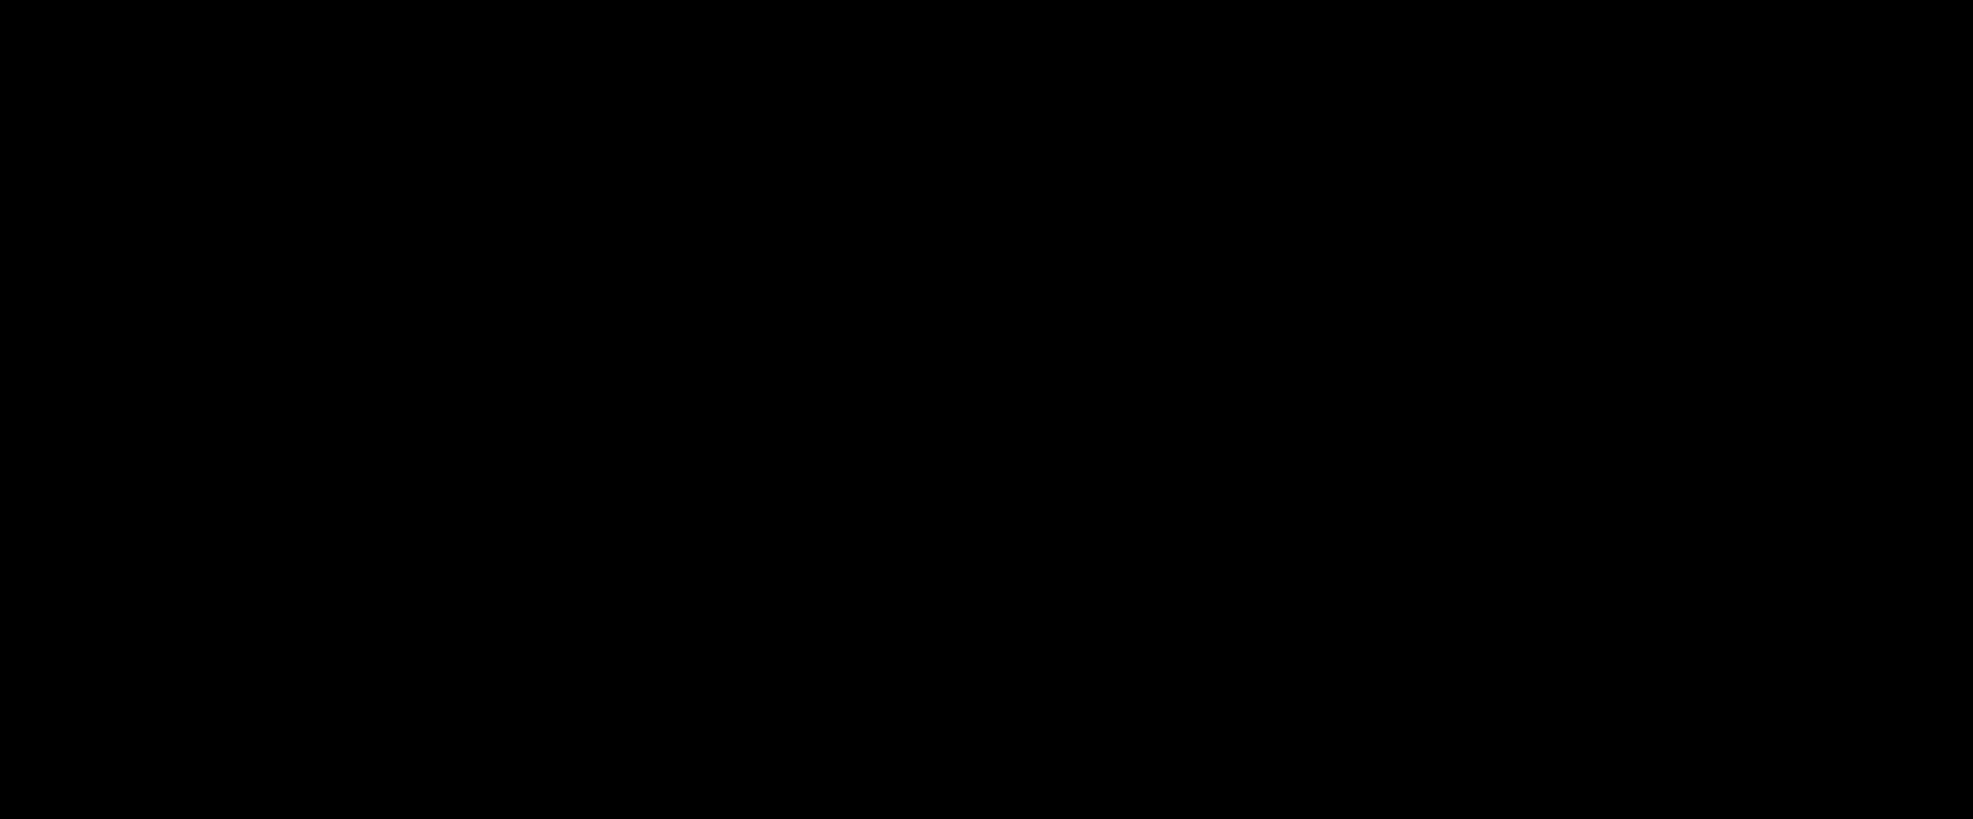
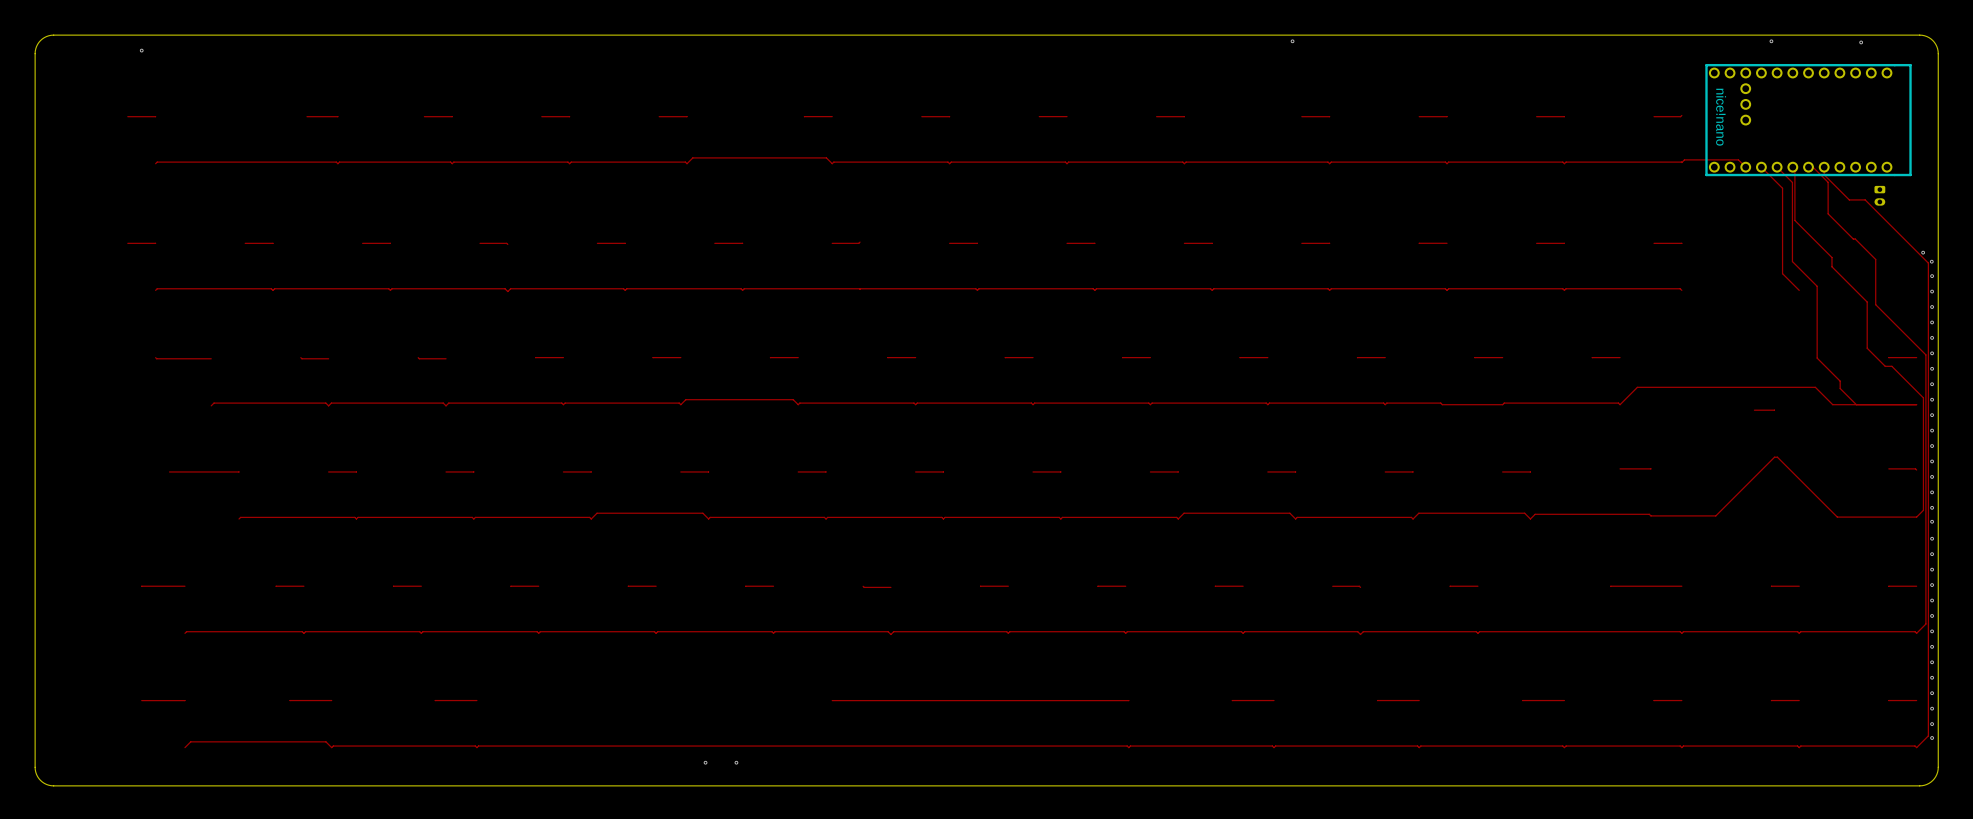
board edge: none -> (53, 35) (1926, 36) (1934, 42) (1938, 53) (1936, 774) (1931, 782) (1919, 785) (46, 784) (37, 776) (35, 767) (35, 53) (40, 40) (53, 35)
via: none -> (1292, 41)
via: none -> (1771, 41)
via: none -> (1861, 42)
via: none -> (141, 50)
track: none -> (1681, 115) (1654, 116)
track: none -> (127, 116) (155, 116)
track: none -> (307, 116) (337, 116)
track: none -> (424, 116) (452, 116)
track: none -> (541, 116) (569, 116)
track: none -> (659, 116) (686, 116)
track: none -> (804, 116) (832, 116)
track: none -> (921, 116) (949, 116)
track: none -> (1039, 116) (1067, 116)
track: none -> (1156, 116) (1184, 116)
track: none -> (1301, 116) (1329, 116)
track: none -> (1419, 116) (1446, 116)
track: none -> (1536, 116) (1564, 116)
text: none -> nice!nano (1721, 117)
part: none -> (1808, 120)
track: none -> (155, 163) (157, 162) (336, 162) (337, 163) (339, 162) (450, 162) (452, 163) (453, 162) (568, 162) (569, 163) (571, 162) (685, 162) (687, 163) (692, 157) (826, 157) (832, 163) (833, 162) (948, 162) (949, 163) (951, 162) (1065, 162) (1067, 163) (1068, 162) (1182, 162) (1184, 163) (1186, 162) (1328, 162) (1329, 163) (1331, 162) (1445, 162) (1447, 163) (1448, 162) (1562, 162) (1564, 163) (1566, 162) (1681, 162) (1684, 159) (1738, 159) (1745, 167)
track: none -> (1761, 167) (1782, 188) (1782, 273) (1799, 290)
track: none -> (1777, 167) (1792, 182) (1792, 261) (1817, 286) (1817, 358) (1840, 381) (1840, 388) (1856, 404)
track: none -> (1792, 167) (1794, 169) (1794, 220) (1831, 257) (1831, 266) (1867, 302) (1867, 348) (1885, 366) (1891, 366) (1923, 397) (1923, 510) (1916, 517) (1837, 517) (1777, 457) (1774, 457) (1715, 515) (1535, 514) (1530, 519) (1524, 513) (1418, 513) (1413, 519) (1411, 517) (1297, 517) (1295, 519) (1289, 513) (1184, 513) (1178, 519) (1176, 517) (1062, 517) (1060, 519) (1059, 517) (945, 517) (943, 519) (941, 517) (827, 517) (826, 519) (824, 517) (710, 517) (708, 519) (702, 513) (597, 513) (591, 519) (589, 517) (475, 517) (473, 519) (472, 517) (358, 517) (356, 519) (354, 517) (240, 517) (239, 519)
track: none -> (1808, 167) (1812, 167) (1828, 182) (1828, 213) (1875, 259) (1875, 304) (1925, 354) (1925, 624) (1916, 633) (1915, 631) (1800, 631) (1799, 633) (1797, 631) (1683, 631) (1681, 633) (1680, 631) (1479, 631) (1477, 633) (1476, 631) (1363, 631) (1360, 634) (1357, 631) (1244, 631) (1243, 633) (1241, 631) (1127, 631) (1125, 633) (1124, 631) (1009, 631) (1008, 633) (1006, 631) (893, 631) (890, 634) (888, 631) (775, 631) (773, 633) (771, 631) (657, 631) (656, 633) (654, 631) (540, 631) (538, 633) (537, 631) (422, 631) (421, 633) (419, 631) (305, 631) (303, 633) (302, 631) (186, 631) (184, 633)
track: none -> (1824, 167) (1824, 174) (1849, 199) (1865, 199) (1928, 263) (1928, 735) (1916, 747) (1915, 746) (1800, 746) (1799, 747) (1797, 746) (1683, 746) (1681, 747) (1680, 746) (1566, 746) (1564, 747) (1562, 746) (1420, 746) (1419, 747) (1417, 746) (1275, 746) (1274, 747) (1272, 746) (1130, 746) (1128, 747) (1127, 746) (478, 746) (476, 747) (475, 746) (333, 746) (331, 747) (325, 741) (190, 741) (184, 747)
part: none -> (1879, 195)
track: none -> (860, 242) (832, 243)
track: none -> (127, 243) (155, 243)
track: none -> (245, 243) (272, 243)
track: none -> (362, 243) (390, 243)
track: none -> (480, 243) (507, 244)
track: none -> (597, 243) (625, 243)
track: none -> (714, 243) (742, 243)
track: none -> (949, 243) (977, 243)
track: none -> (1067, 243) (1094, 243)
track: none -> (1184, 243) (1212, 243)
track: none -> (1301, 243) (1329, 243)
track: none -> (1419, 243) (1447, 243)
track: none -> (1536, 243) (1564, 243)
track: none -> (1654, 243) (1681, 243)
via: none -> (1923, 252)
via: none -> (1931, 261)
via: none -> (1932, 276)
track: none -> (155, 290) (157, 288) (271, 288) (273, 290) (274, 288) (388, 288) (390, 290) (392, 288) (505, 288) (507, 291) (510, 288) (623, 288) (625, 290) (626, 288) (741, 288) (742, 290) (744, 288) (975, 288) (977, 290) (979, 288) (1093, 288) (1094, 290) (1096, 288) (1210, 288) (1212, 290) (1213, 288) (1328, 288) (1329, 290) (1331, 288) (1445, 288) (1447, 290) (1448, 288) (1562, 288) (1564, 290) (1566, 288) (1680, 288) (1681, 290)
via: none -> (1932, 291)
via: none -> (1932, 307)
via: none -> (1932, 322)
via: none -> (1932, 337)
via: none -> (1932, 353)
track: none -> (155, 357) (211, 358)
track: none -> (300, 357) (328, 358)
track: none -> (418, 357) (446, 358)
track: none -> (535, 357) (563, 357)
track: none -> (653, 357) (680, 357)
track: none -> (770, 357) (798, 357)
track: none -> (887, 357) (915, 357)
track: none -> (1005, 357) (1033, 357)
track: none -> (1122, 357) (1150, 357)
track: none -> (1240, 357) (1267, 357)
track: none -> (1357, 357) (1385, 357)
track: none -> (1474, 357) (1502, 357)
track: none -> (1592, 357) (1620, 357)
track: none -> (1888, 357) (1916, 357)
via: none -> (1932, 368)
via: none -> (1932, 384)
via: none -> (1932, 399)
track: none -> (1916, 404) (1832, 404) (1815, 387) (1637, 387) (1620, 404) (1618, 403) (1504, 403) (1502, 404) (799, 403) (798, 404) (793, 399) (685, 399) (680, 404) (679, 403) (565, 403) (563, 404) (561, 403) (448, 403) (446, 405) (443, 403) (331, 403) (328, 405) (325, 403) (214, 403) (211, 405)
track: none -> (1754, 410) (1774, 410)
via: none -> (1932, 415)
via: none -> (1932, 430)
via: none -> (1932, 446)
via: none -> (1932, 461)
track: none -> (1620, 468) (1650, 468)
track: none -> (1888, 468) (1916, 470)
track: none -> (169, 471) (238, 471)
track: none -> (328, 471) (356, 471)
track: none -> (446, 471) (473, 471)
track: none -> (563, 471) (591, 471)
track: none -> (680, 471) (708, 471)
track: none -> (798, 471) (825, 471)
track: none -> (915, 471) (943, 471)
track: none -> (1033, 471) (1060, 471)
track: none -> (1150, 471) (1178, 471)
track: none -> (1267, 471) (1295, 471)
track: none -> (1385, 471) (1412, 471)
track: none -> (1502, 471) (1530, 471)
via: none -> (1932, 476)
via: none -> (1932, 492)
via: none -> (1932, 507)
via: none -> (1932, 521)
via: none -> (1932, 538)
via: none -> (1932, 554)
via: none -> (1932, 569)
via: none -> (1932, 585)
track: none -> (141, 586) (184, 586)
track: none -> (276, 586) (303, 586)
track: none -> (393, 586) (421, 586)
track: none -> (510, 586) (538, 586)
track: none -> (628, 586) (656, 586)
track: none -> (745, 586) (773, 586)
track: none -> (863, 586) (890, 587)
track: none -> (980, 586) (1008, 586)
track: none -> (1097, 586) (1125, 586)
track: none -> (1215, 586) (1243, 586)
track: none -> (1332, 586) (1360, 587)
track: none -> (1450, 586) (1477, 586)
track: none -> (1610, 586) (1681, 586)
track: none -> (1771, 586) (1799, 586)
track: none -> (1888, 586) (1916, 586)
via: none -> (1932, 600)
via: none -> (1932, 615)
via: none -> (1932, 631)
via: none -> (1932, 646)
via: none -> (1932, 662)
via: none -> (1932, 677)
via: none -> (1932, 693)
track: none -> (141, 700) (184, 700)
track: none -> (290, 700) (331, 700)
track: none -> (435, 700) (476, 700)
track: none -> (832, 700) (1128, 700)
track: none -> (1232, 700) (1274, 700)
track: none -> (1377, 700) (1419, 700)
track: none -> (1522, 700) (1564, 700)
track: none -> (1654, 700) (1681, 700)
track: none -> (1771, 700) (1799, 700)
track: none -> (1888, 700) (1916, 700)
via: none -> (1932, 708)
via: none -> (1932, 724)
via: none -> (1932, 737)
via: none -> (705, 762)
via: none -> (736, 762)

